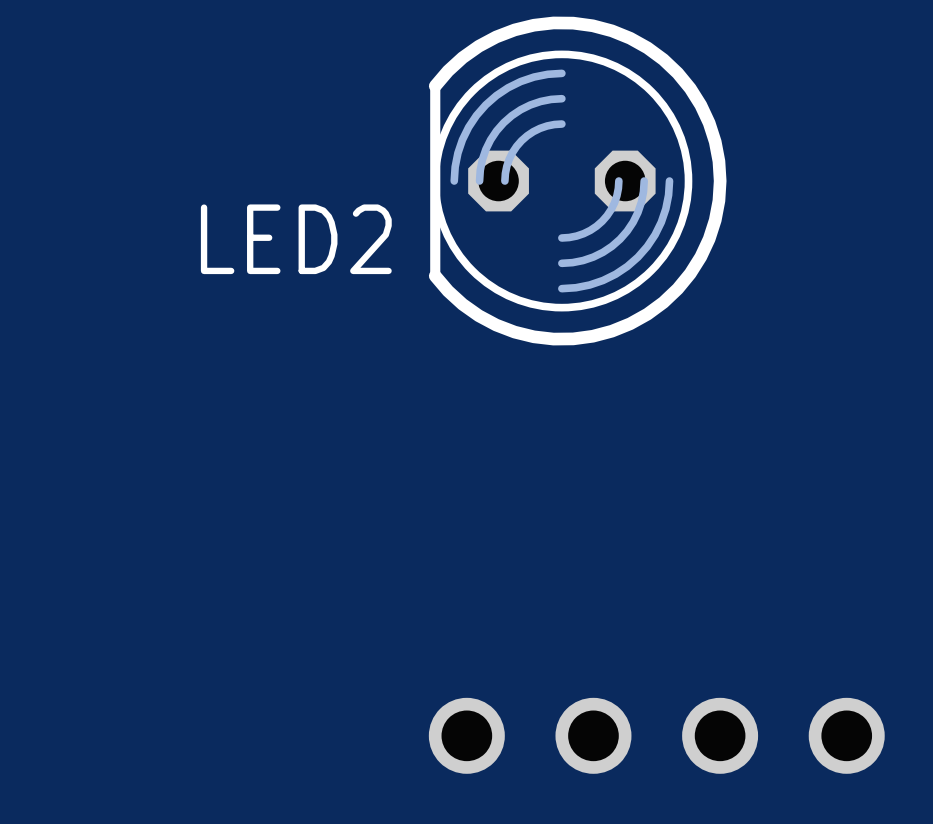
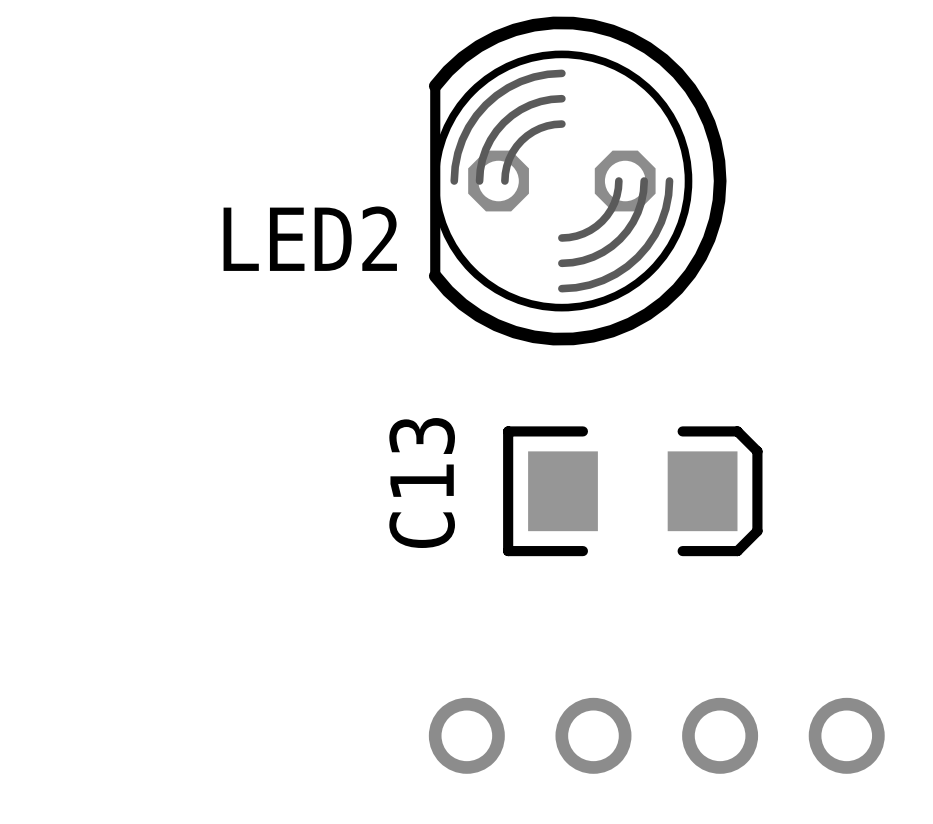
C13: none -> (632, 491)

